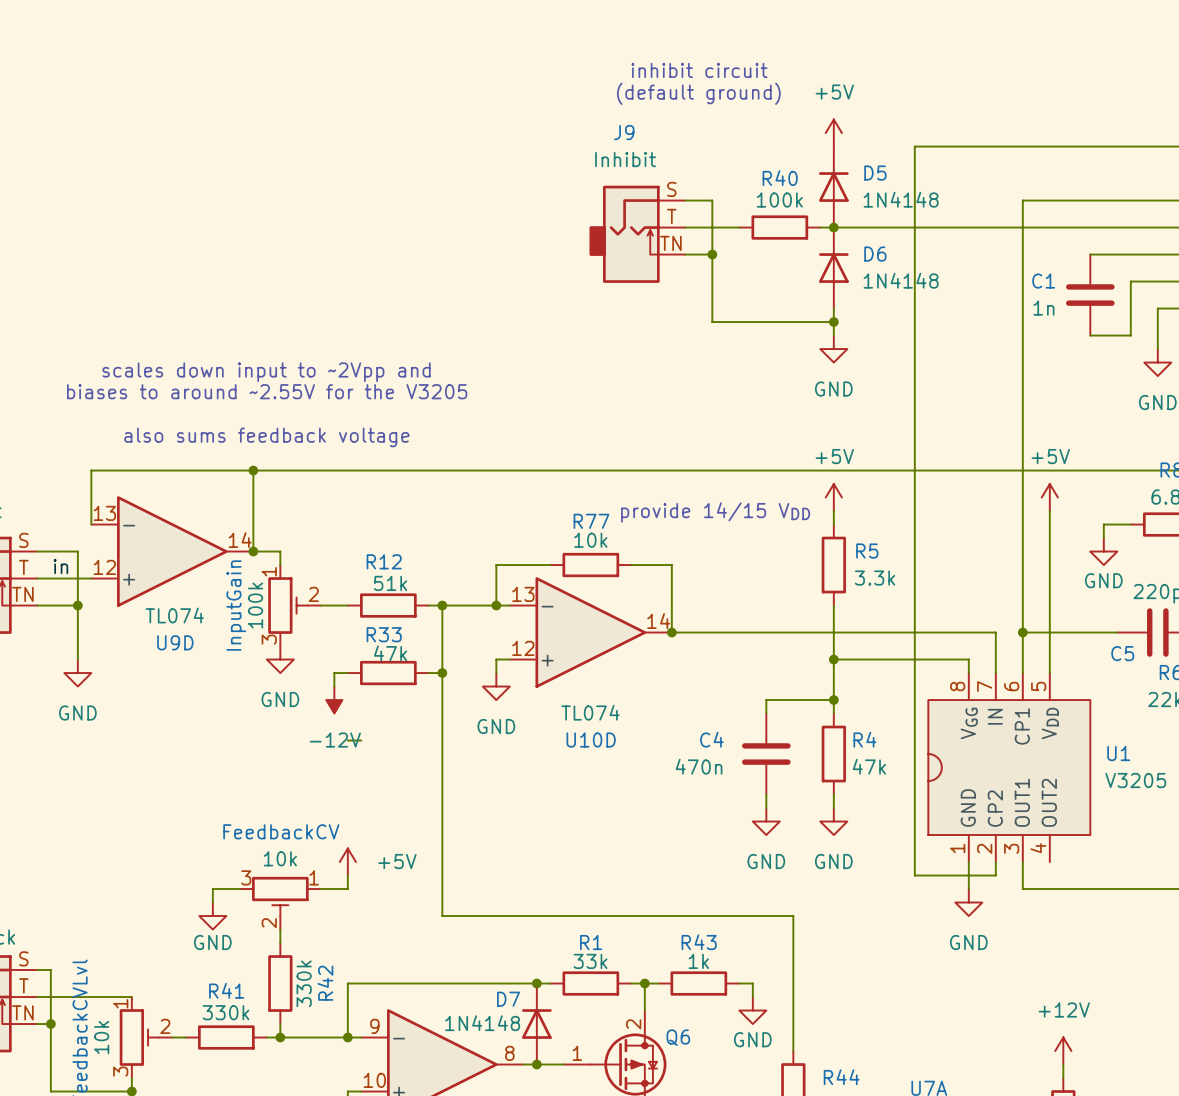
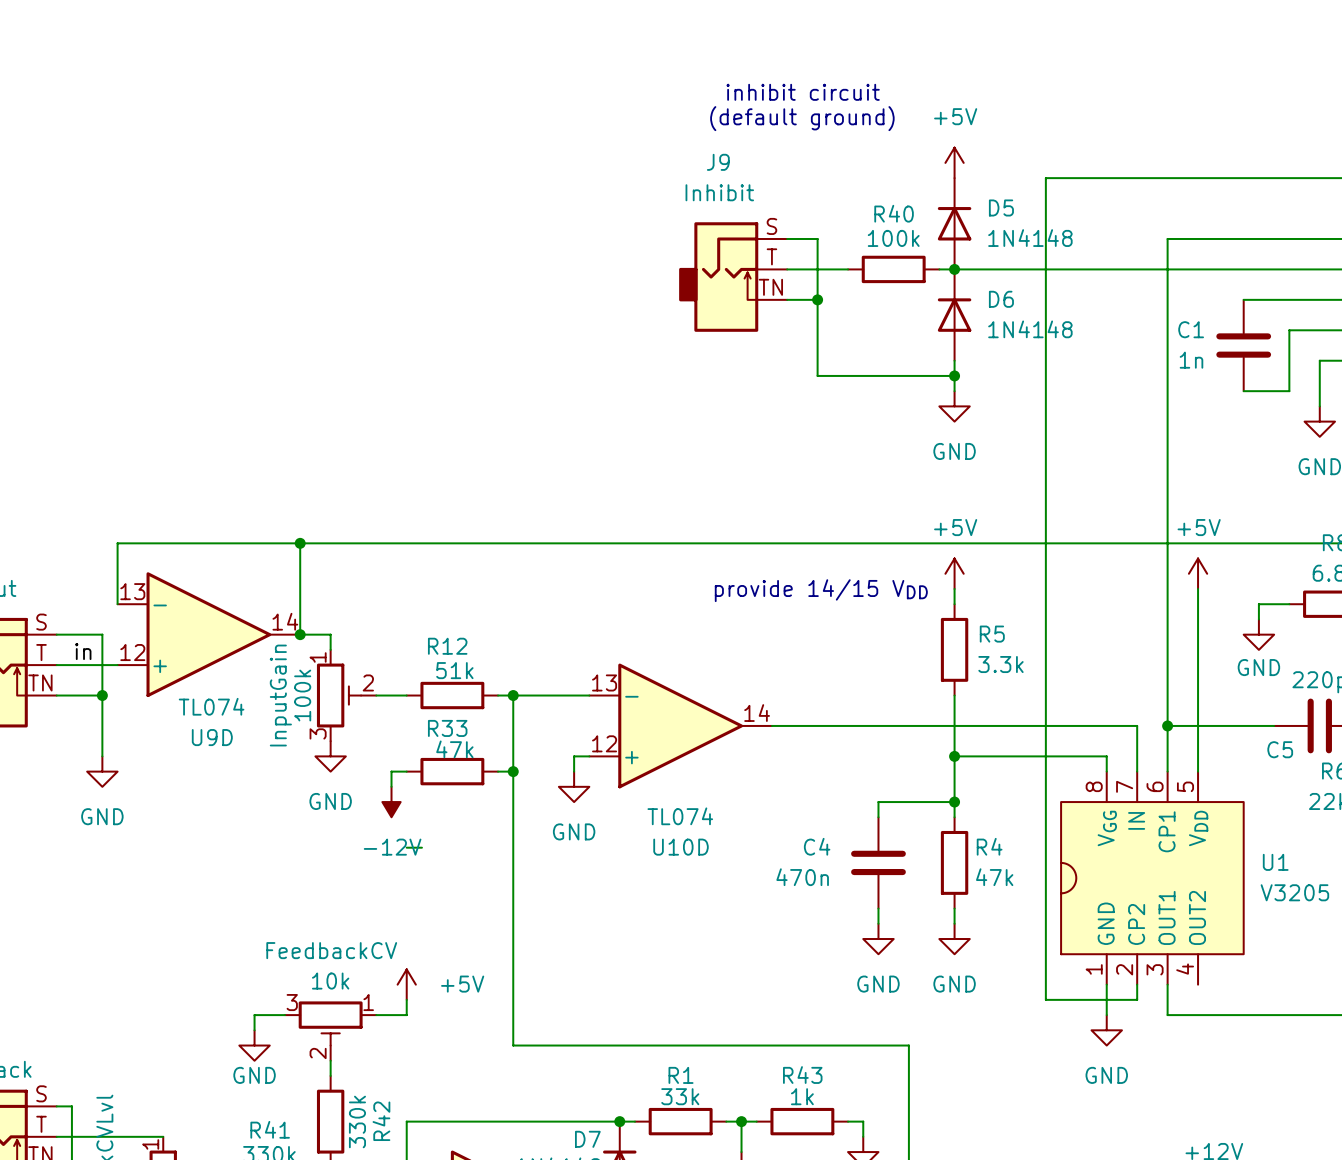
text: scales down input to ~2Vpp and (266, 372) -> none
text: biases to around ~2.55V for the V3205 (267, 391) -> none
text: also sums feedback voltage (266, 437) -> none
wire: (550, 565) (496, 565) (496, 605) -> none
R77: 10k (590, 565) -> none
wire: (631, 565) (671, 565) (671, 632) -> none
junction: (496, 605) -> none
junction: (671, 632) -> none

